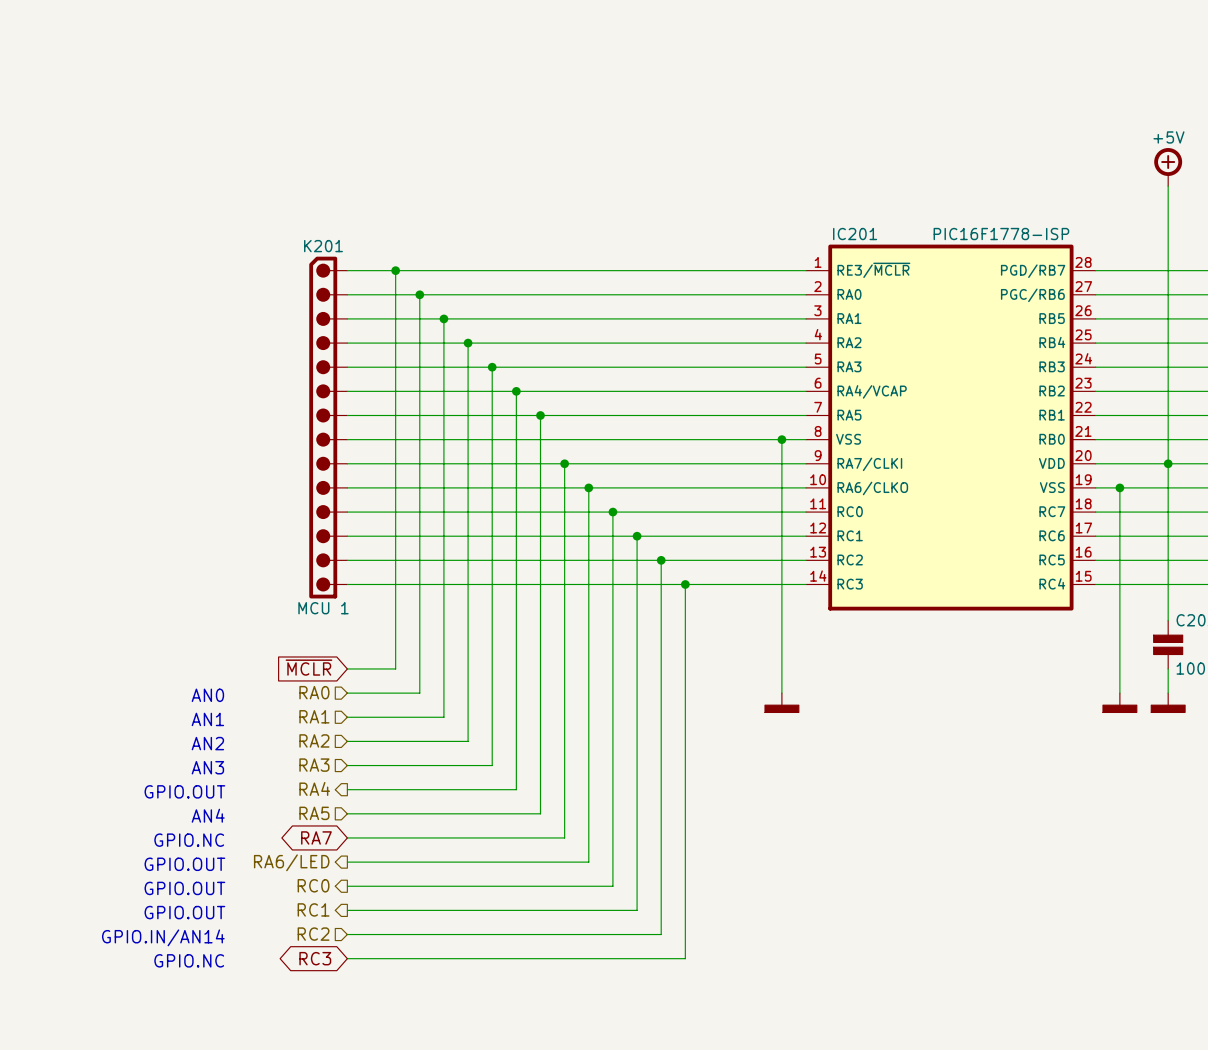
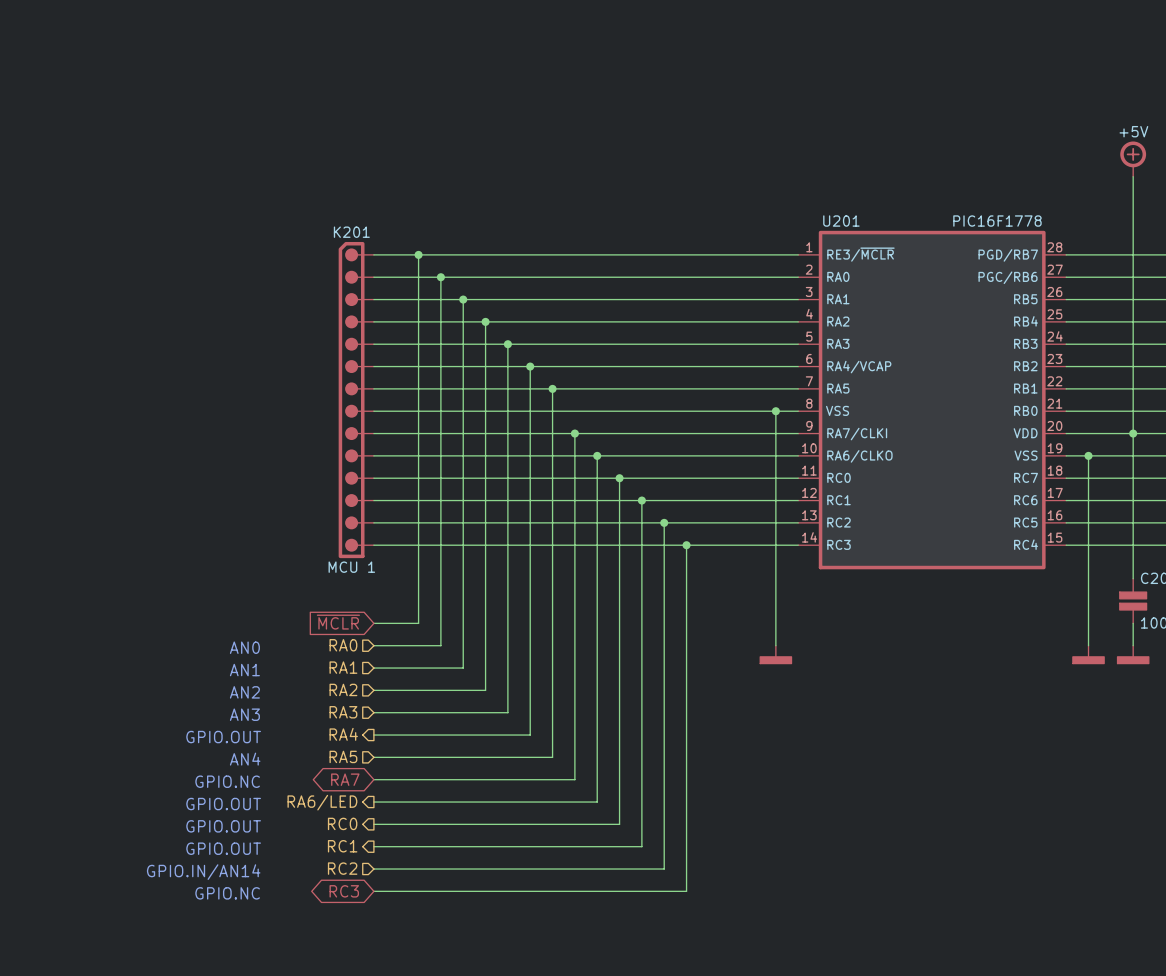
IC201 name: IC201 (855, 234) -> U201 (841, 221)
IC201 text: PIC16F1778-ISP (1001, 234) -> none
IC201 value: none -> PIC16F1778 (997, 221)

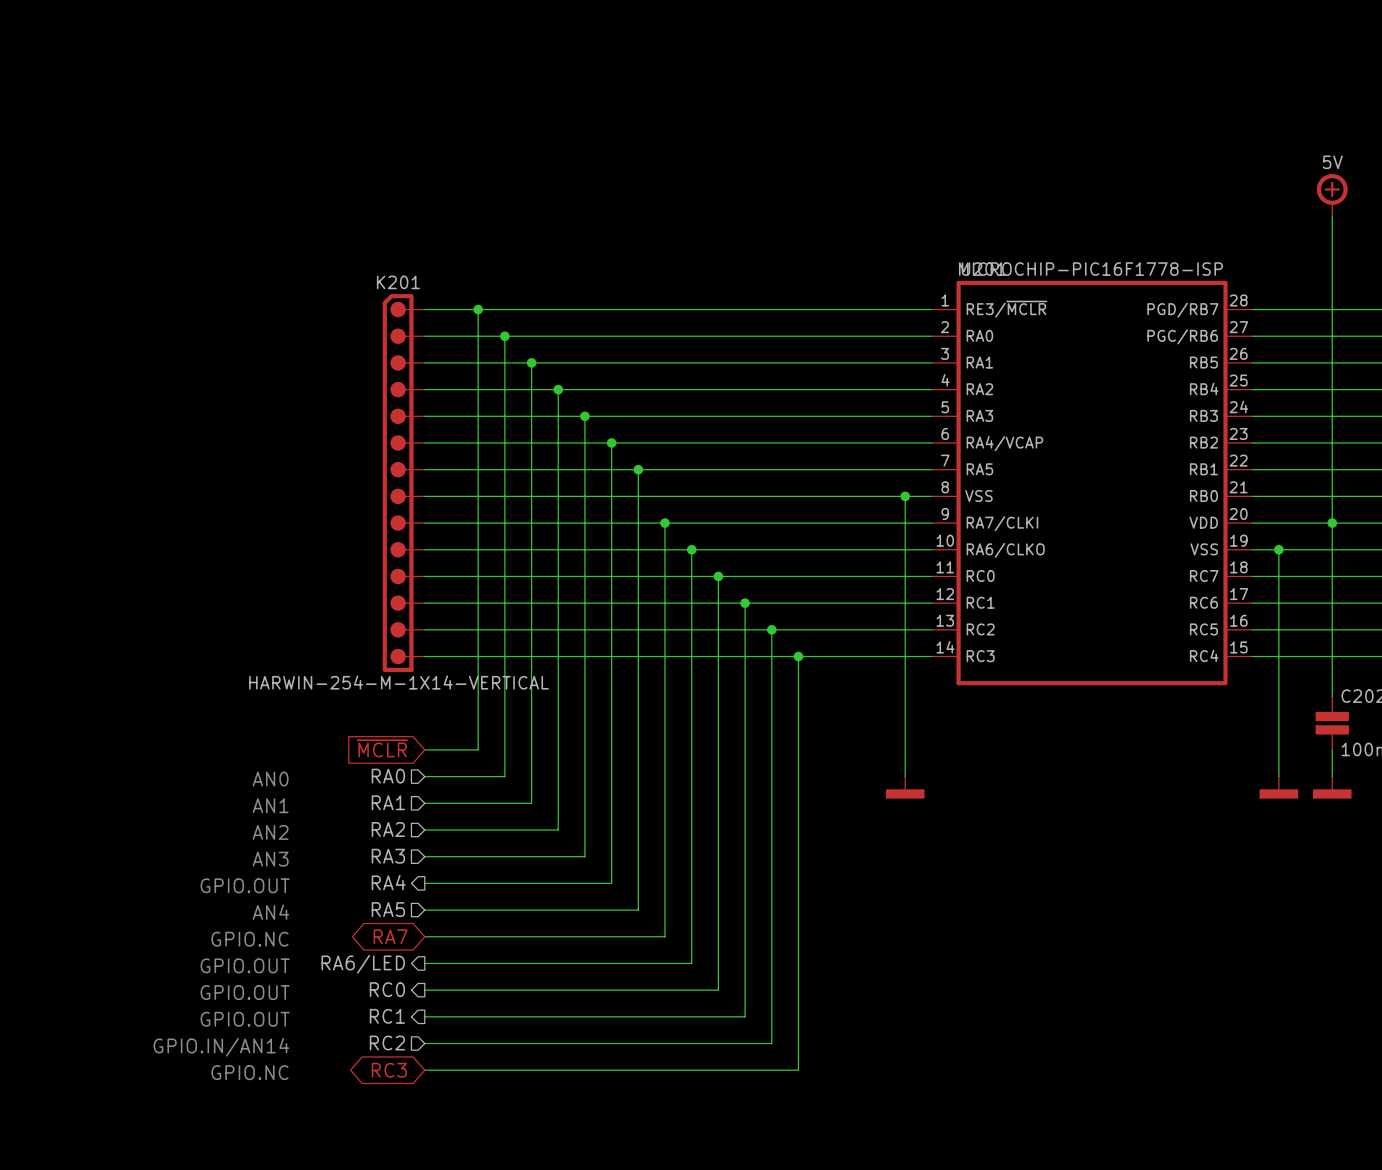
power symbol text: +5V (1133, 131) -> 5V (1332, 162)
U201 value: PIC16F1778 (997, 221) -> MICROCHIP-PIC16F1778-ISP (1090, 269)
K201 value: MCU 1 (351, 567) -> HARWIN-254-M-1X14-VERTICAL (398, 682)

